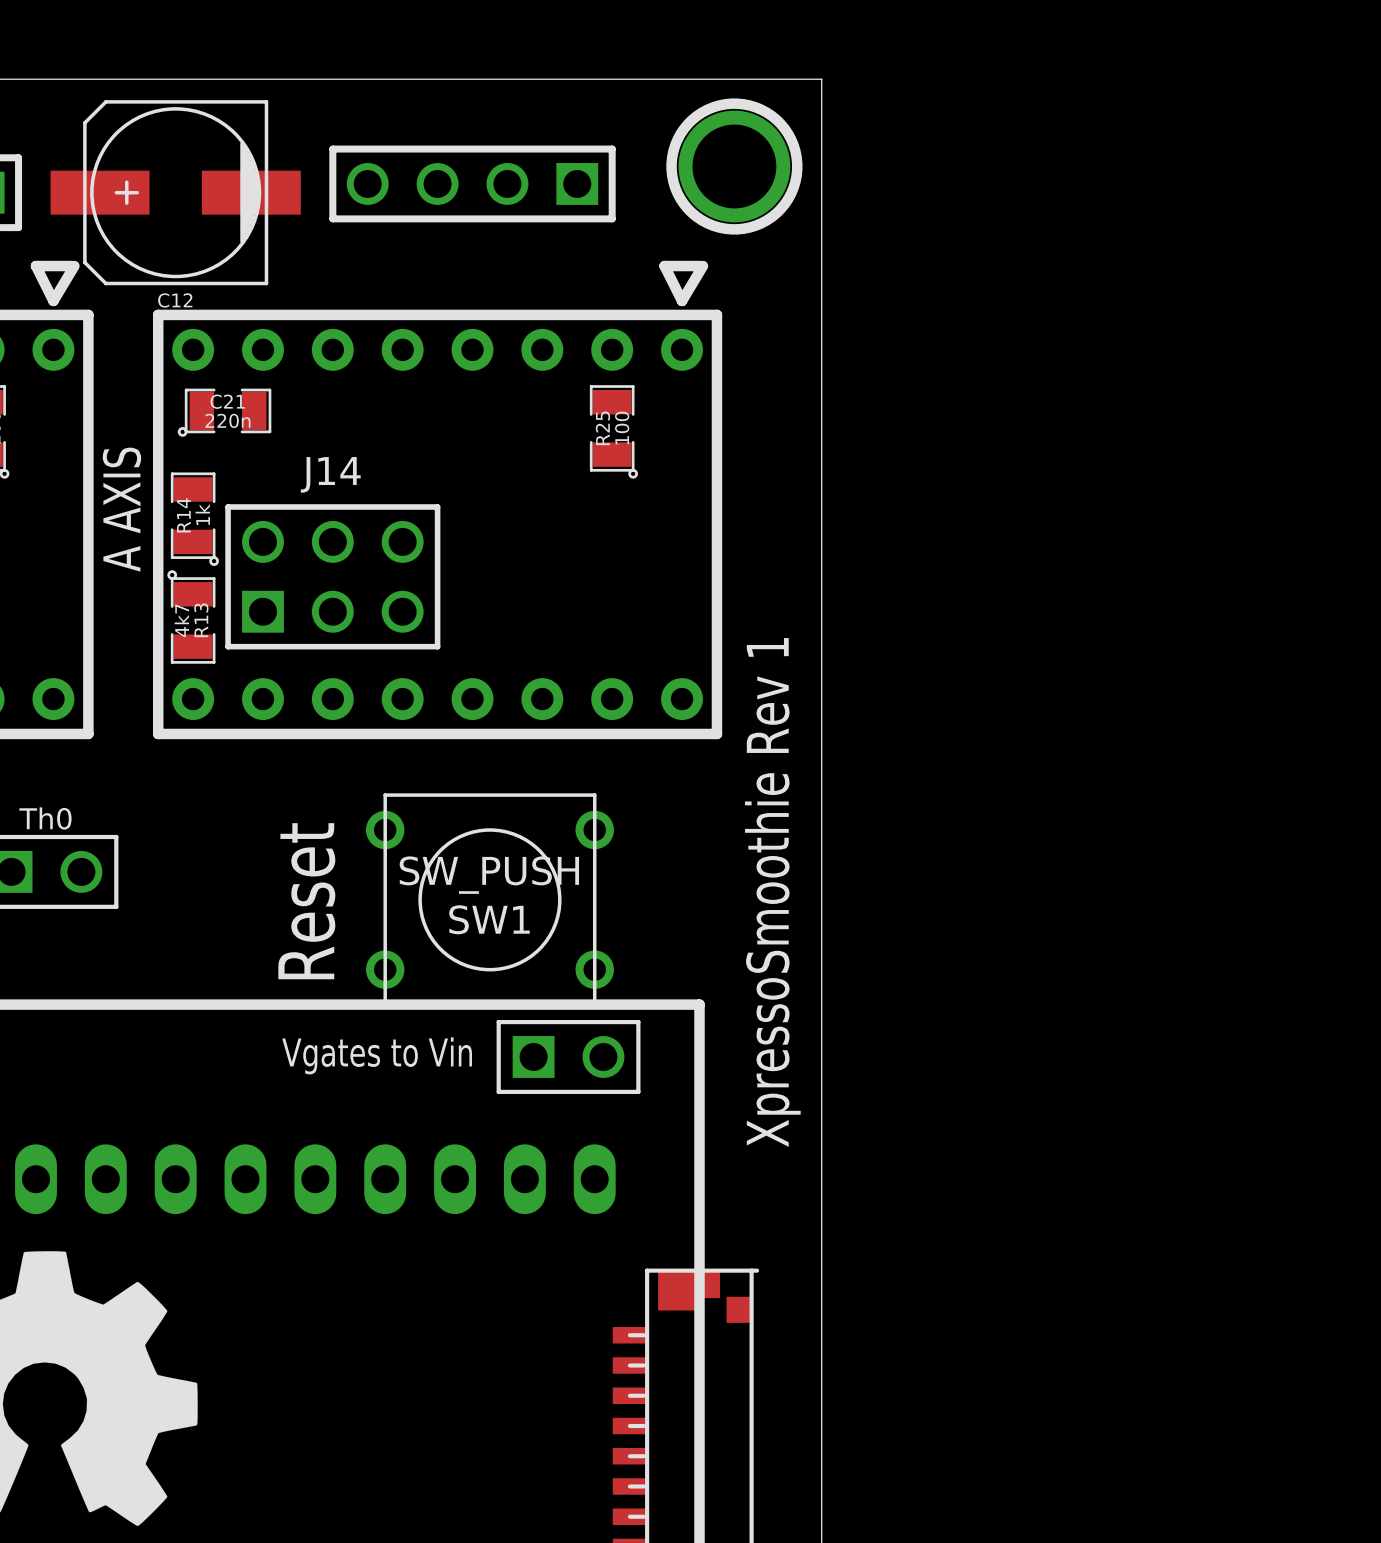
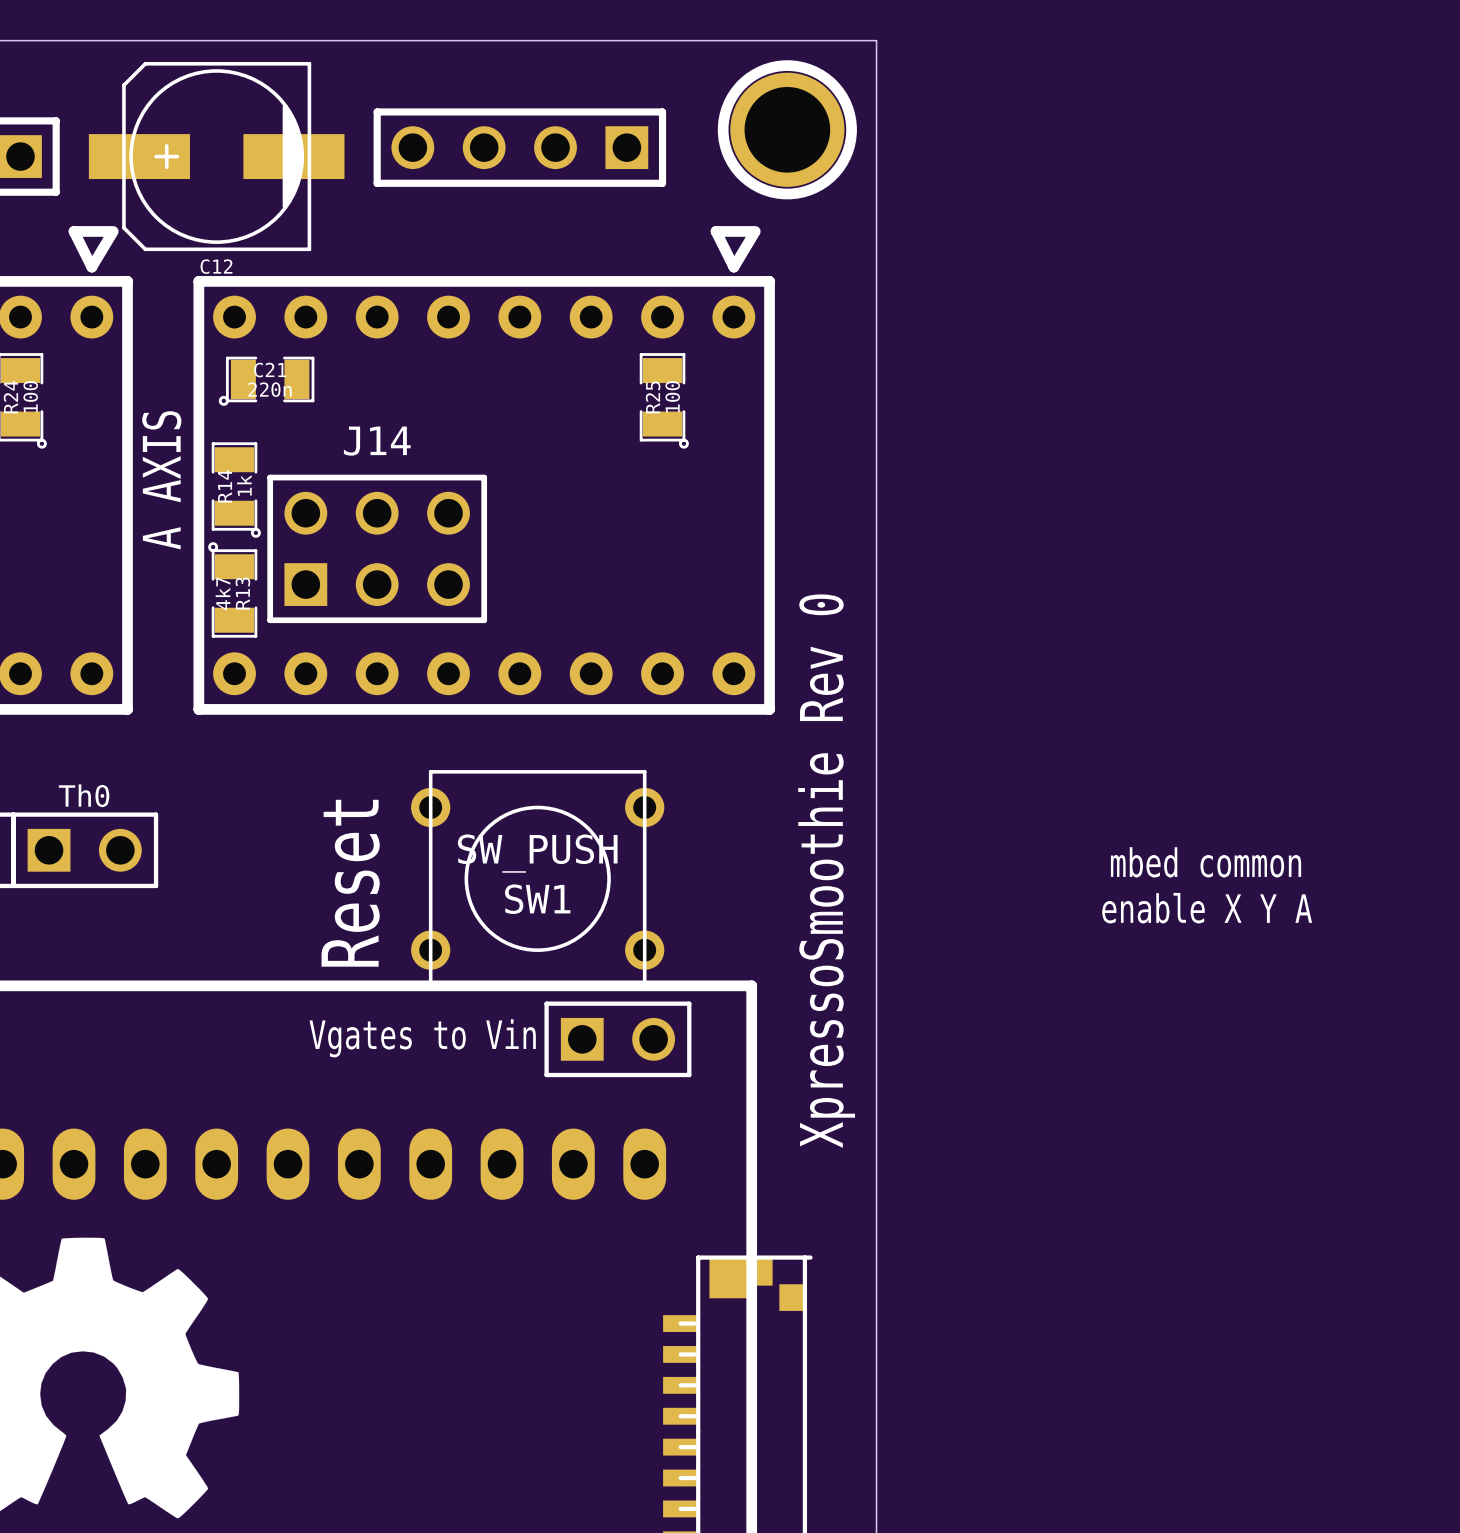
text: none -> mbed common (1206, 862)
text: XpressoSmoothie Rev 1 (772, 892) -> XpressoSmoothie Rev 0 (826, 871)
text: none -> enable X Y A (1207, 908)

